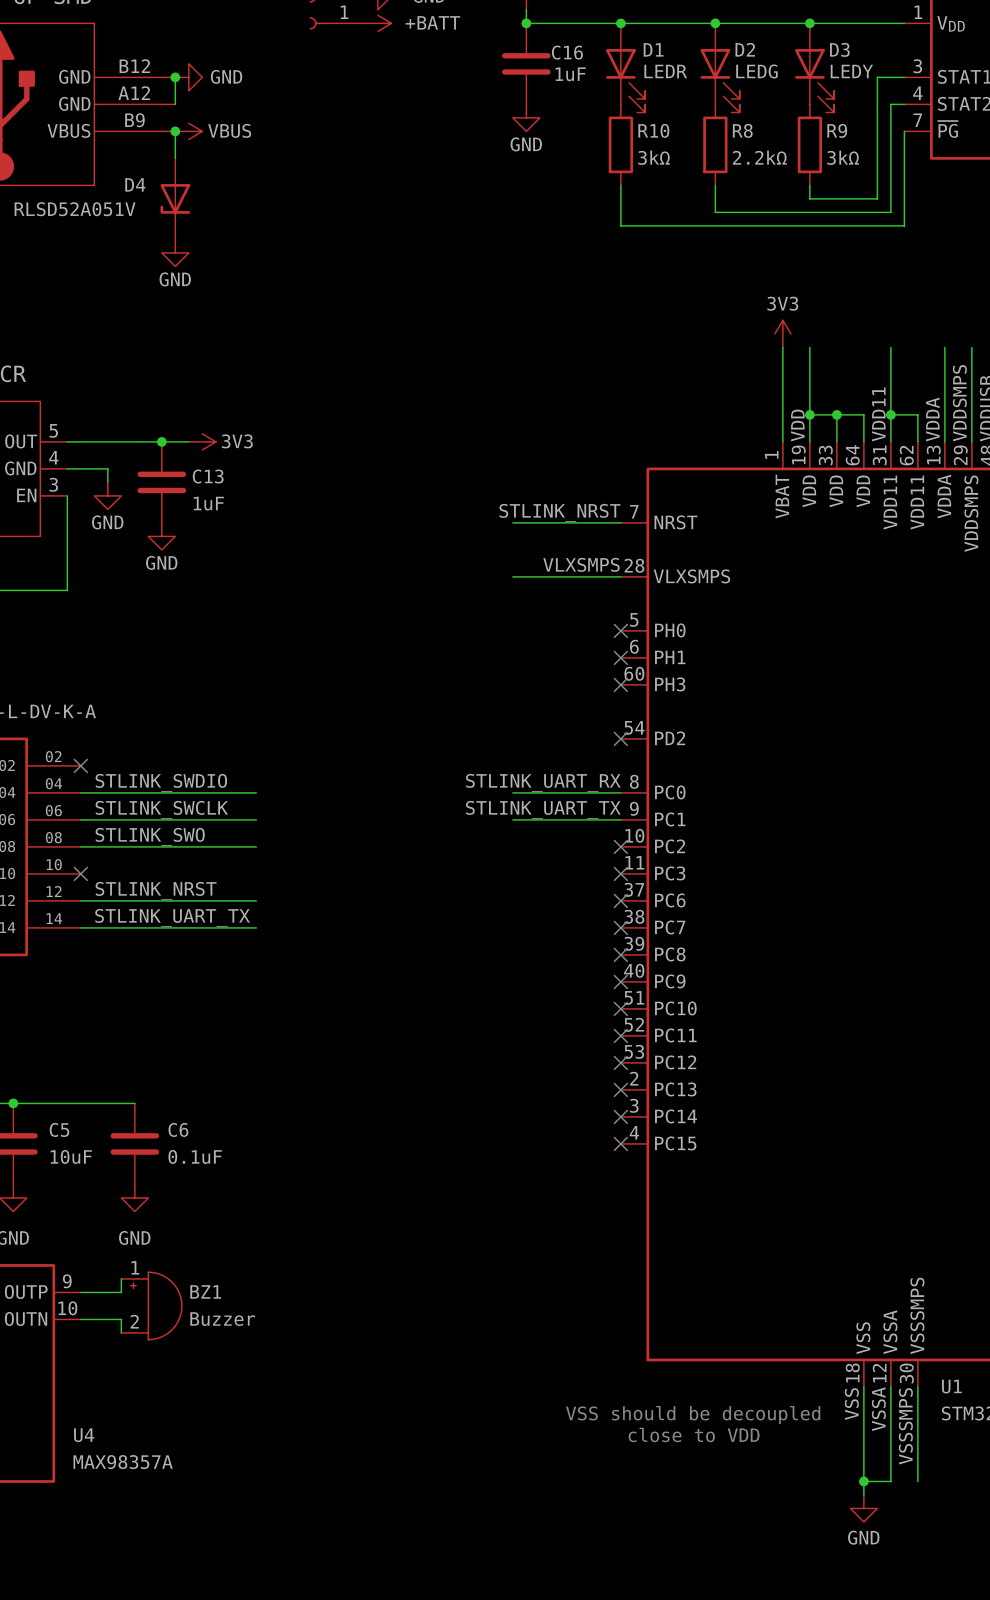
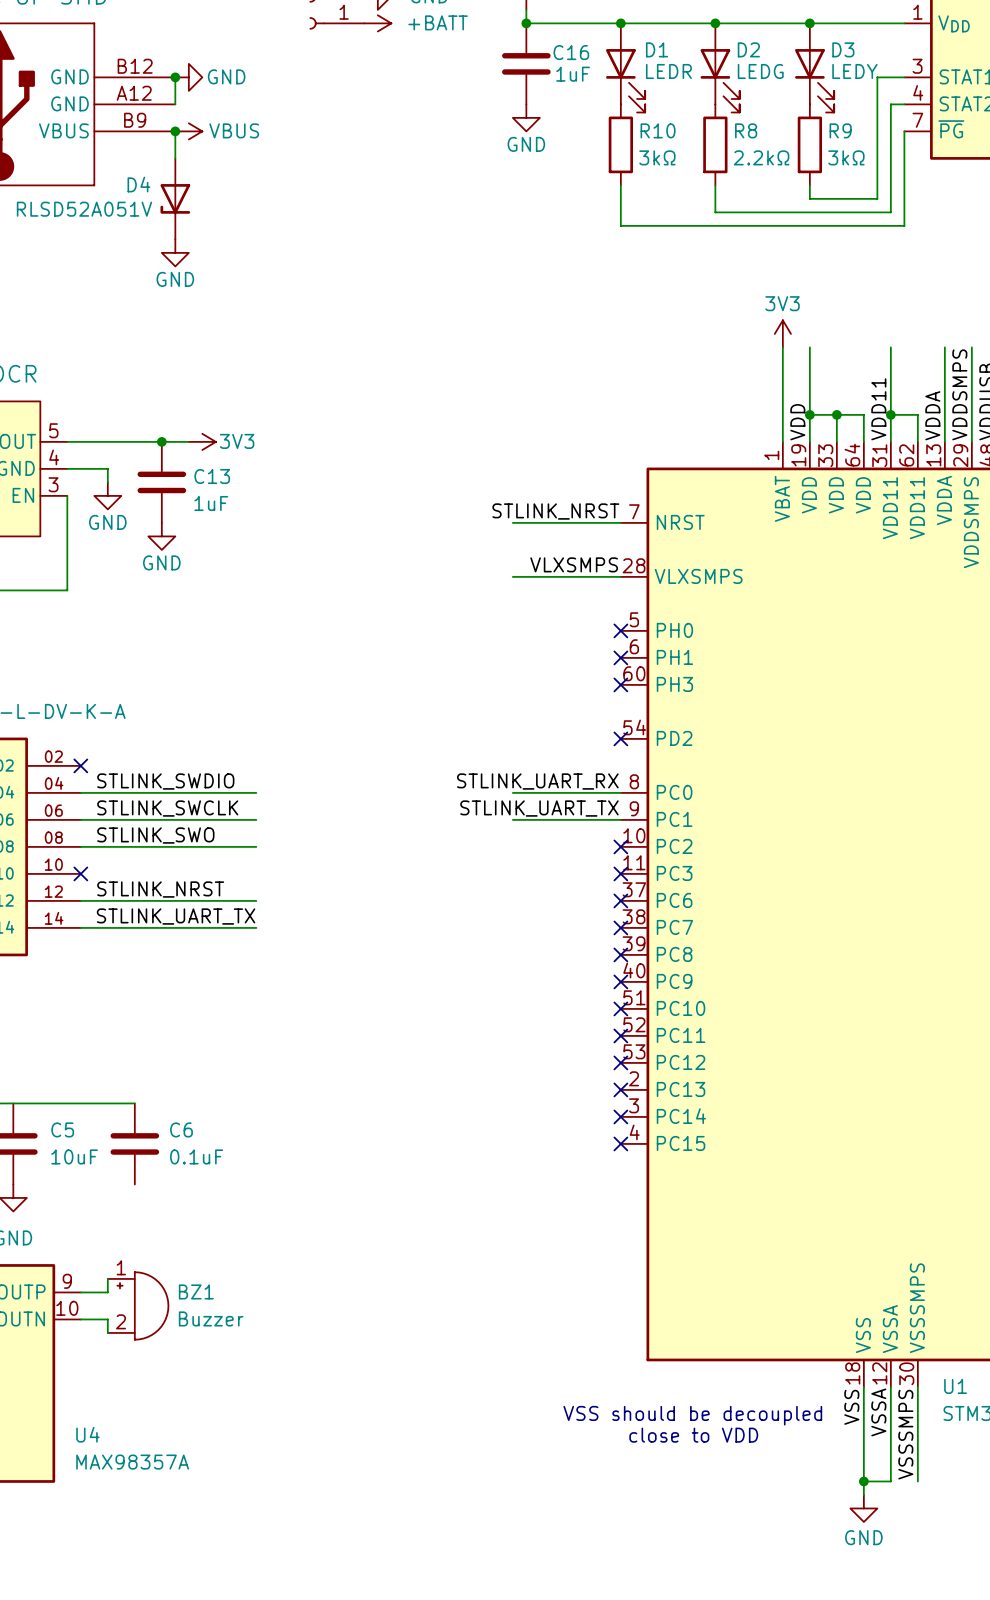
junction: (13, 1103) -> none
power symbol: GND (134, 1197) -> none
wire: (121, 1278) (121, 1292) (107, 1292) -> (107, 1278) (107, 1292)
BZ1 position: (151, 1305) -> (138, 1305)
wire: (107, 1319) (121, 1319) (121, 1332) -> (107, 1319) (107, 1332)

